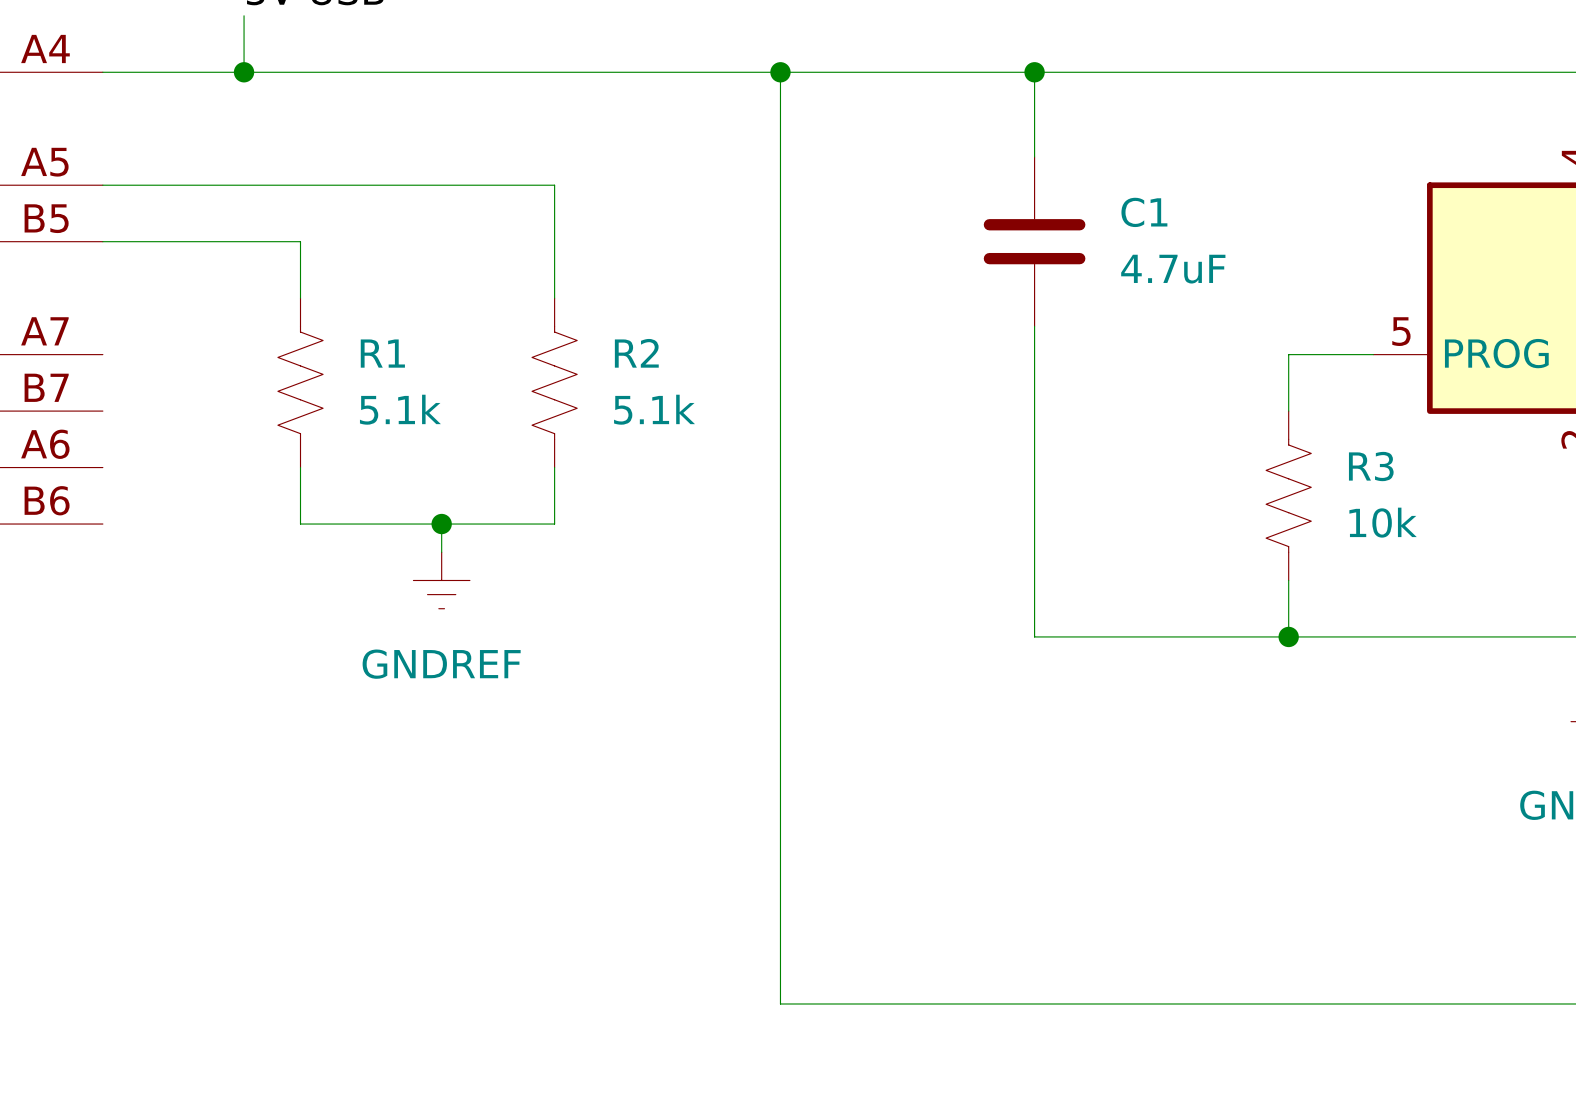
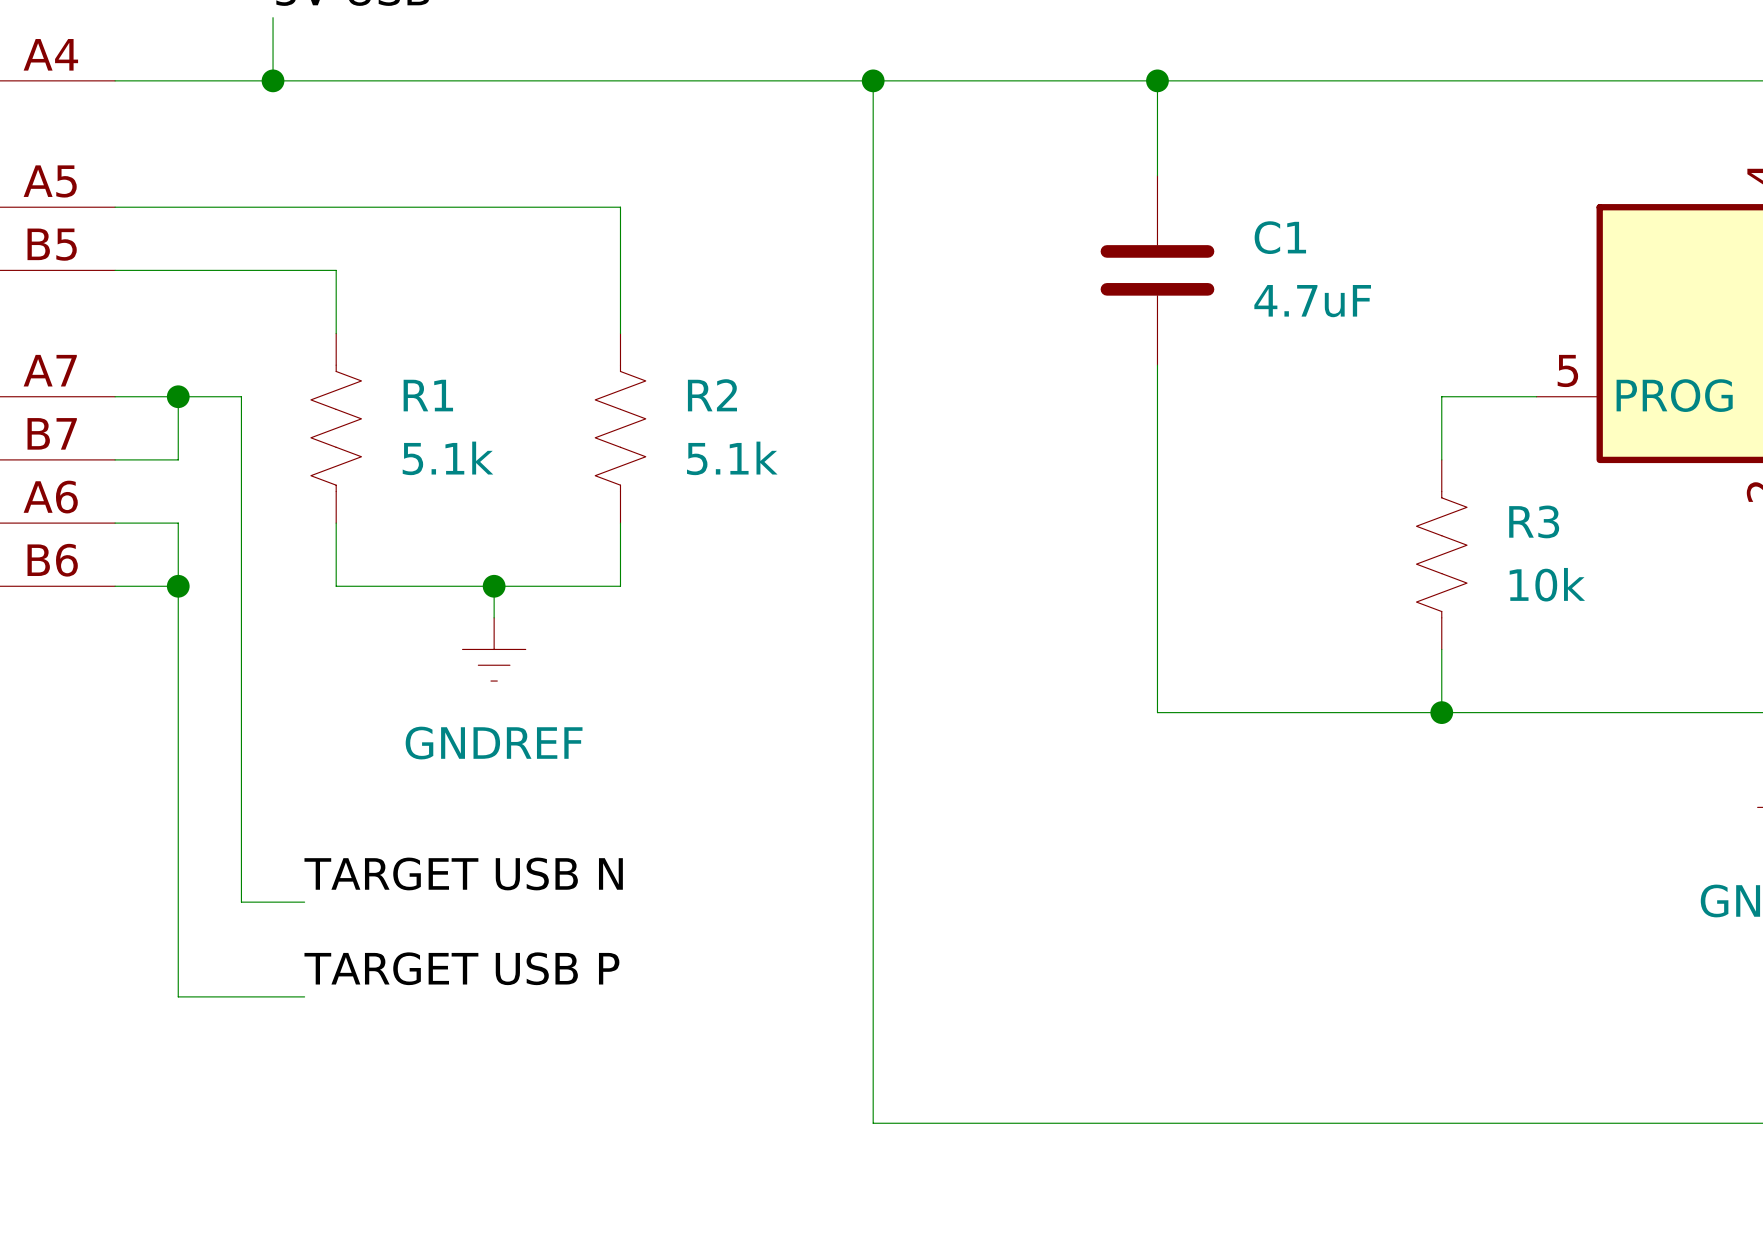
wire: none -> (115, 396) (241, 396) (241, 902) (304, 902)
wire: none -> (178, 396) (178, 459) (115, 459)
junction: none -> (178, 396)
wire: none -> (115, 523) (178, 523) (178, 996) (304, 996)
wire: none -> (115, 586) (178, 586)
junction: none -> (178, 586)
label: none -> TARGET USB N (463, 873)
label: none -> TARGET USB P (461, 968)

